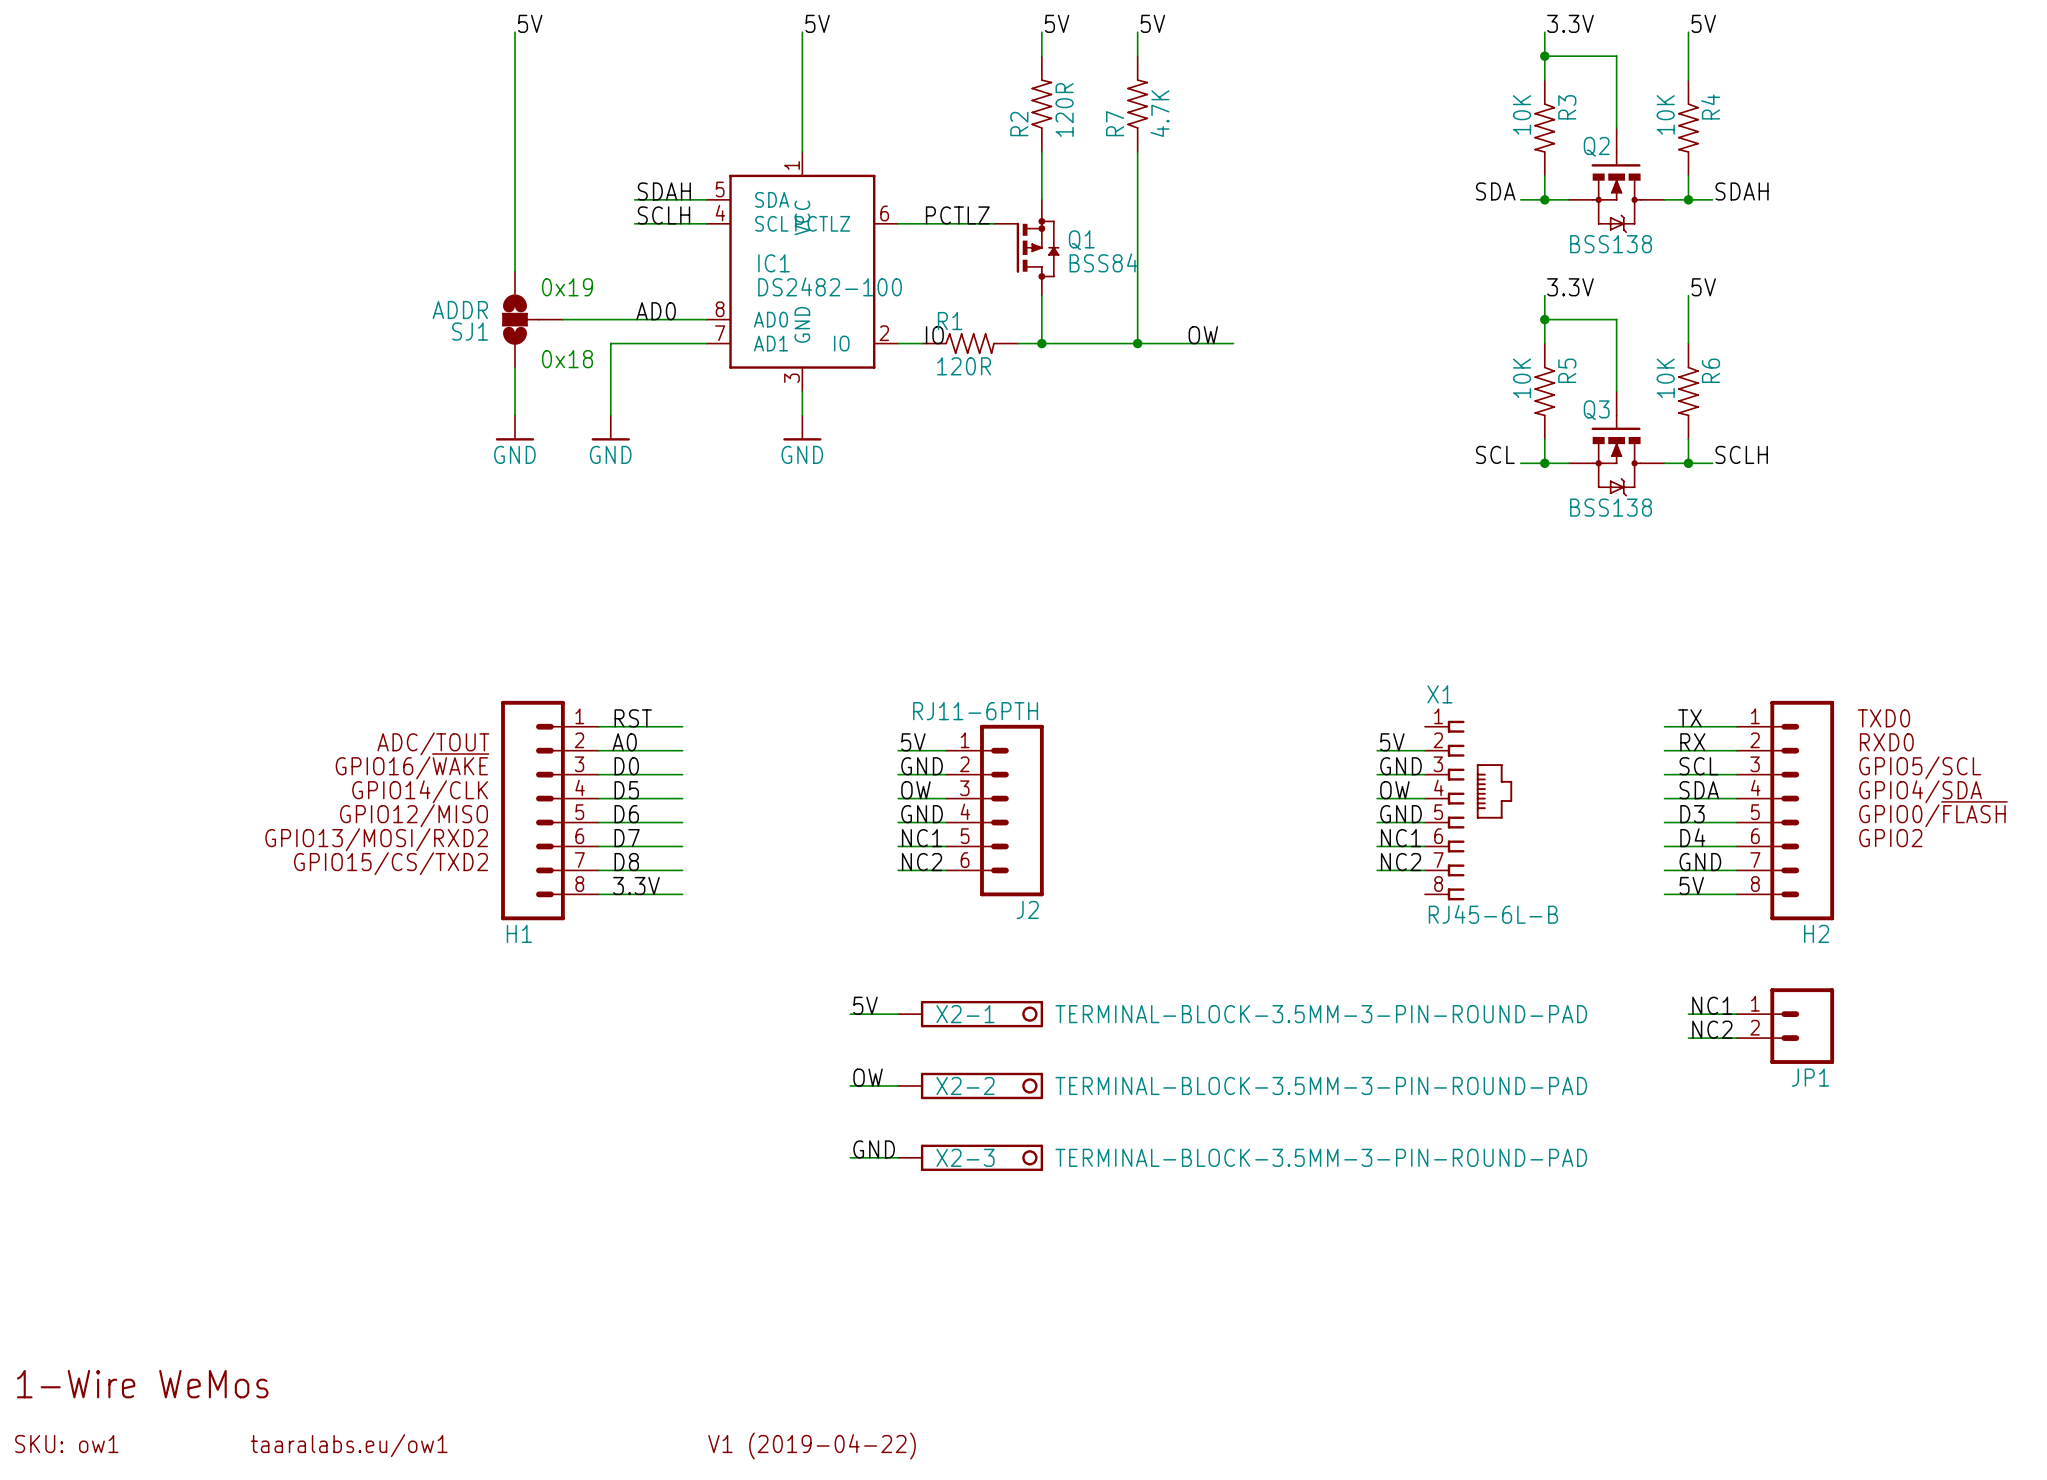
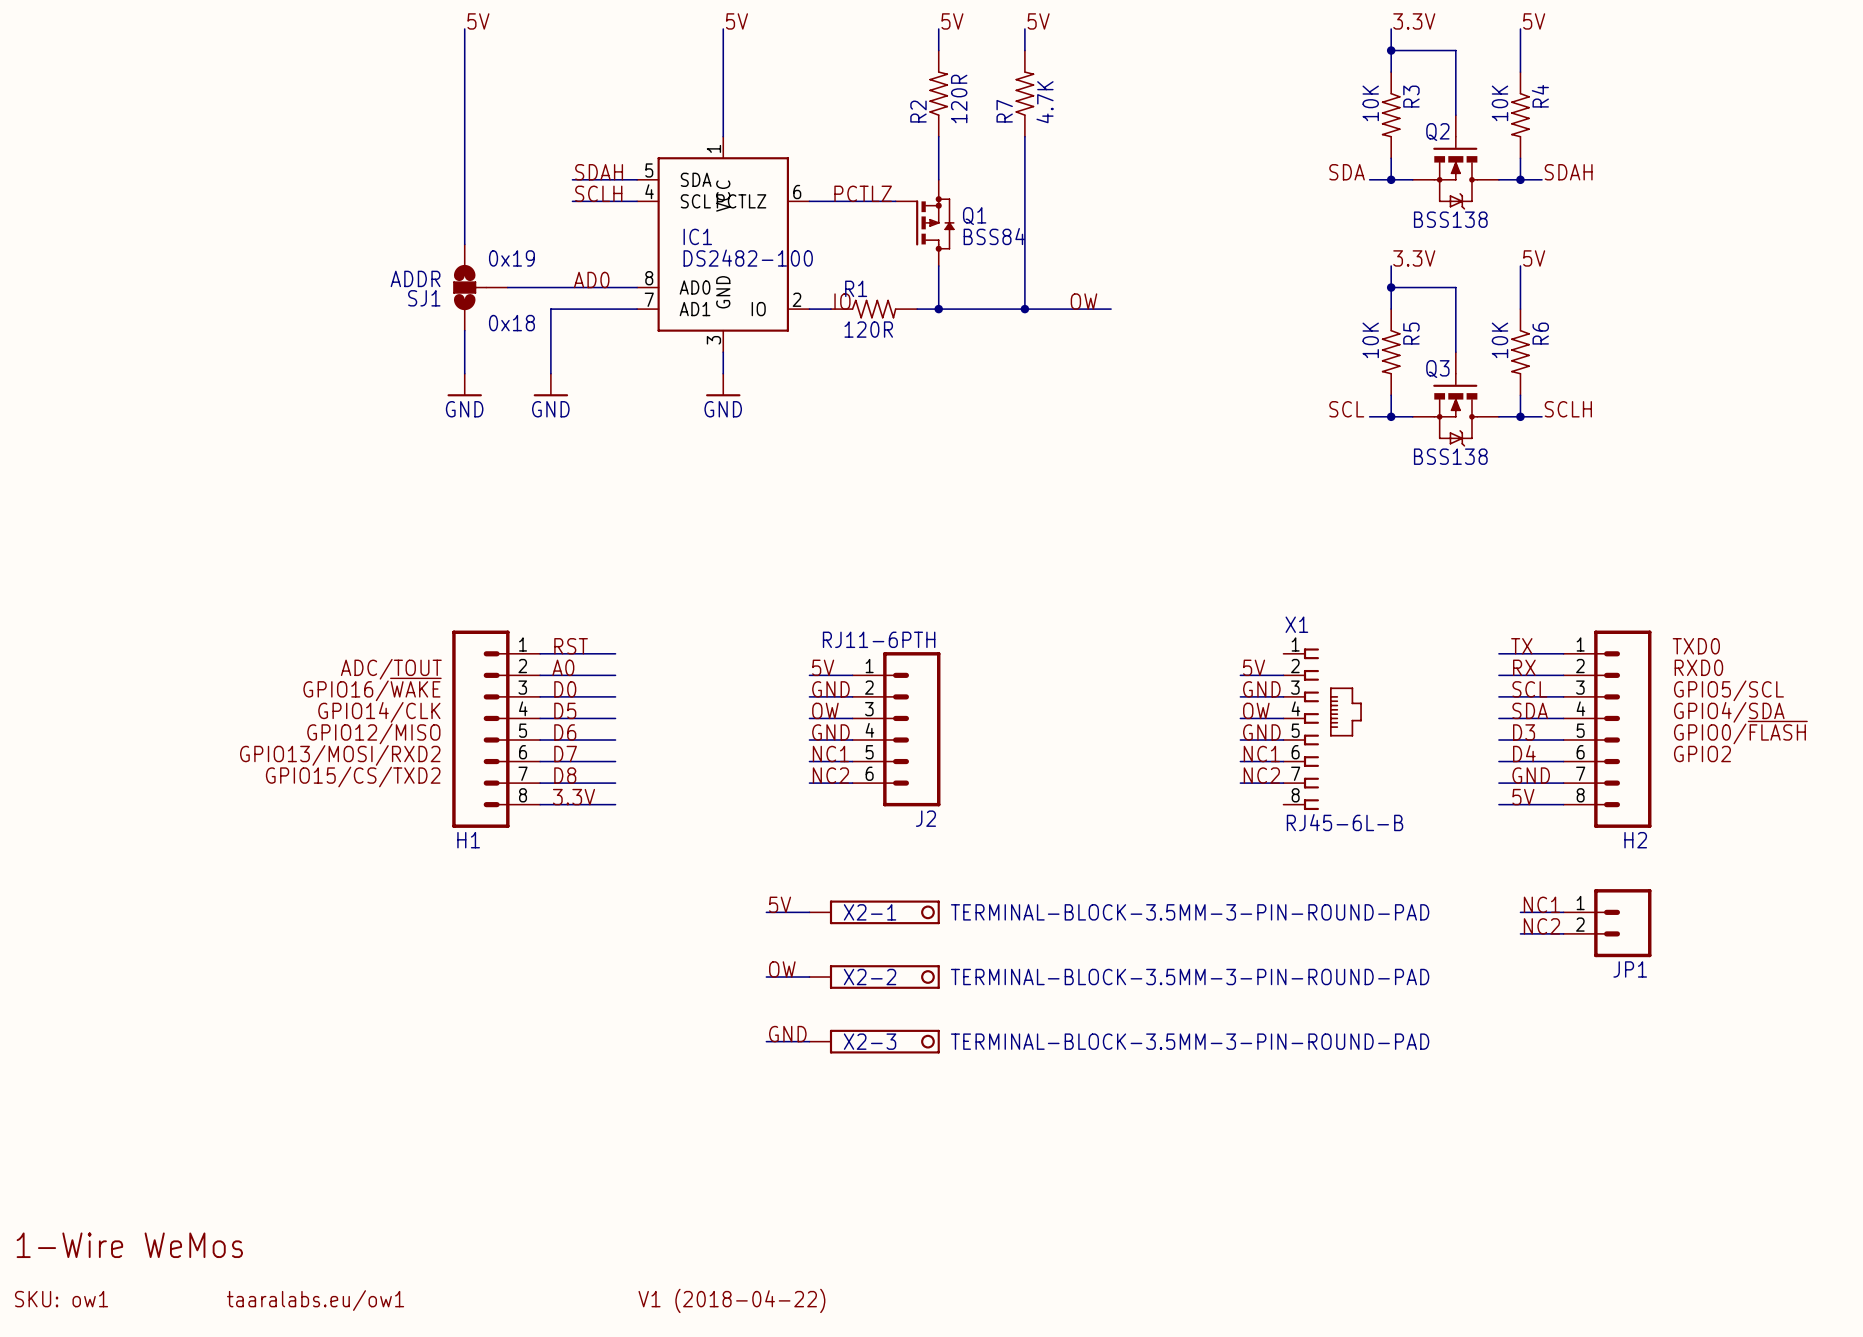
text: V1 (2019-04-22) (811, 1446) -> V1 (2018-04-22) (731, 1300)

